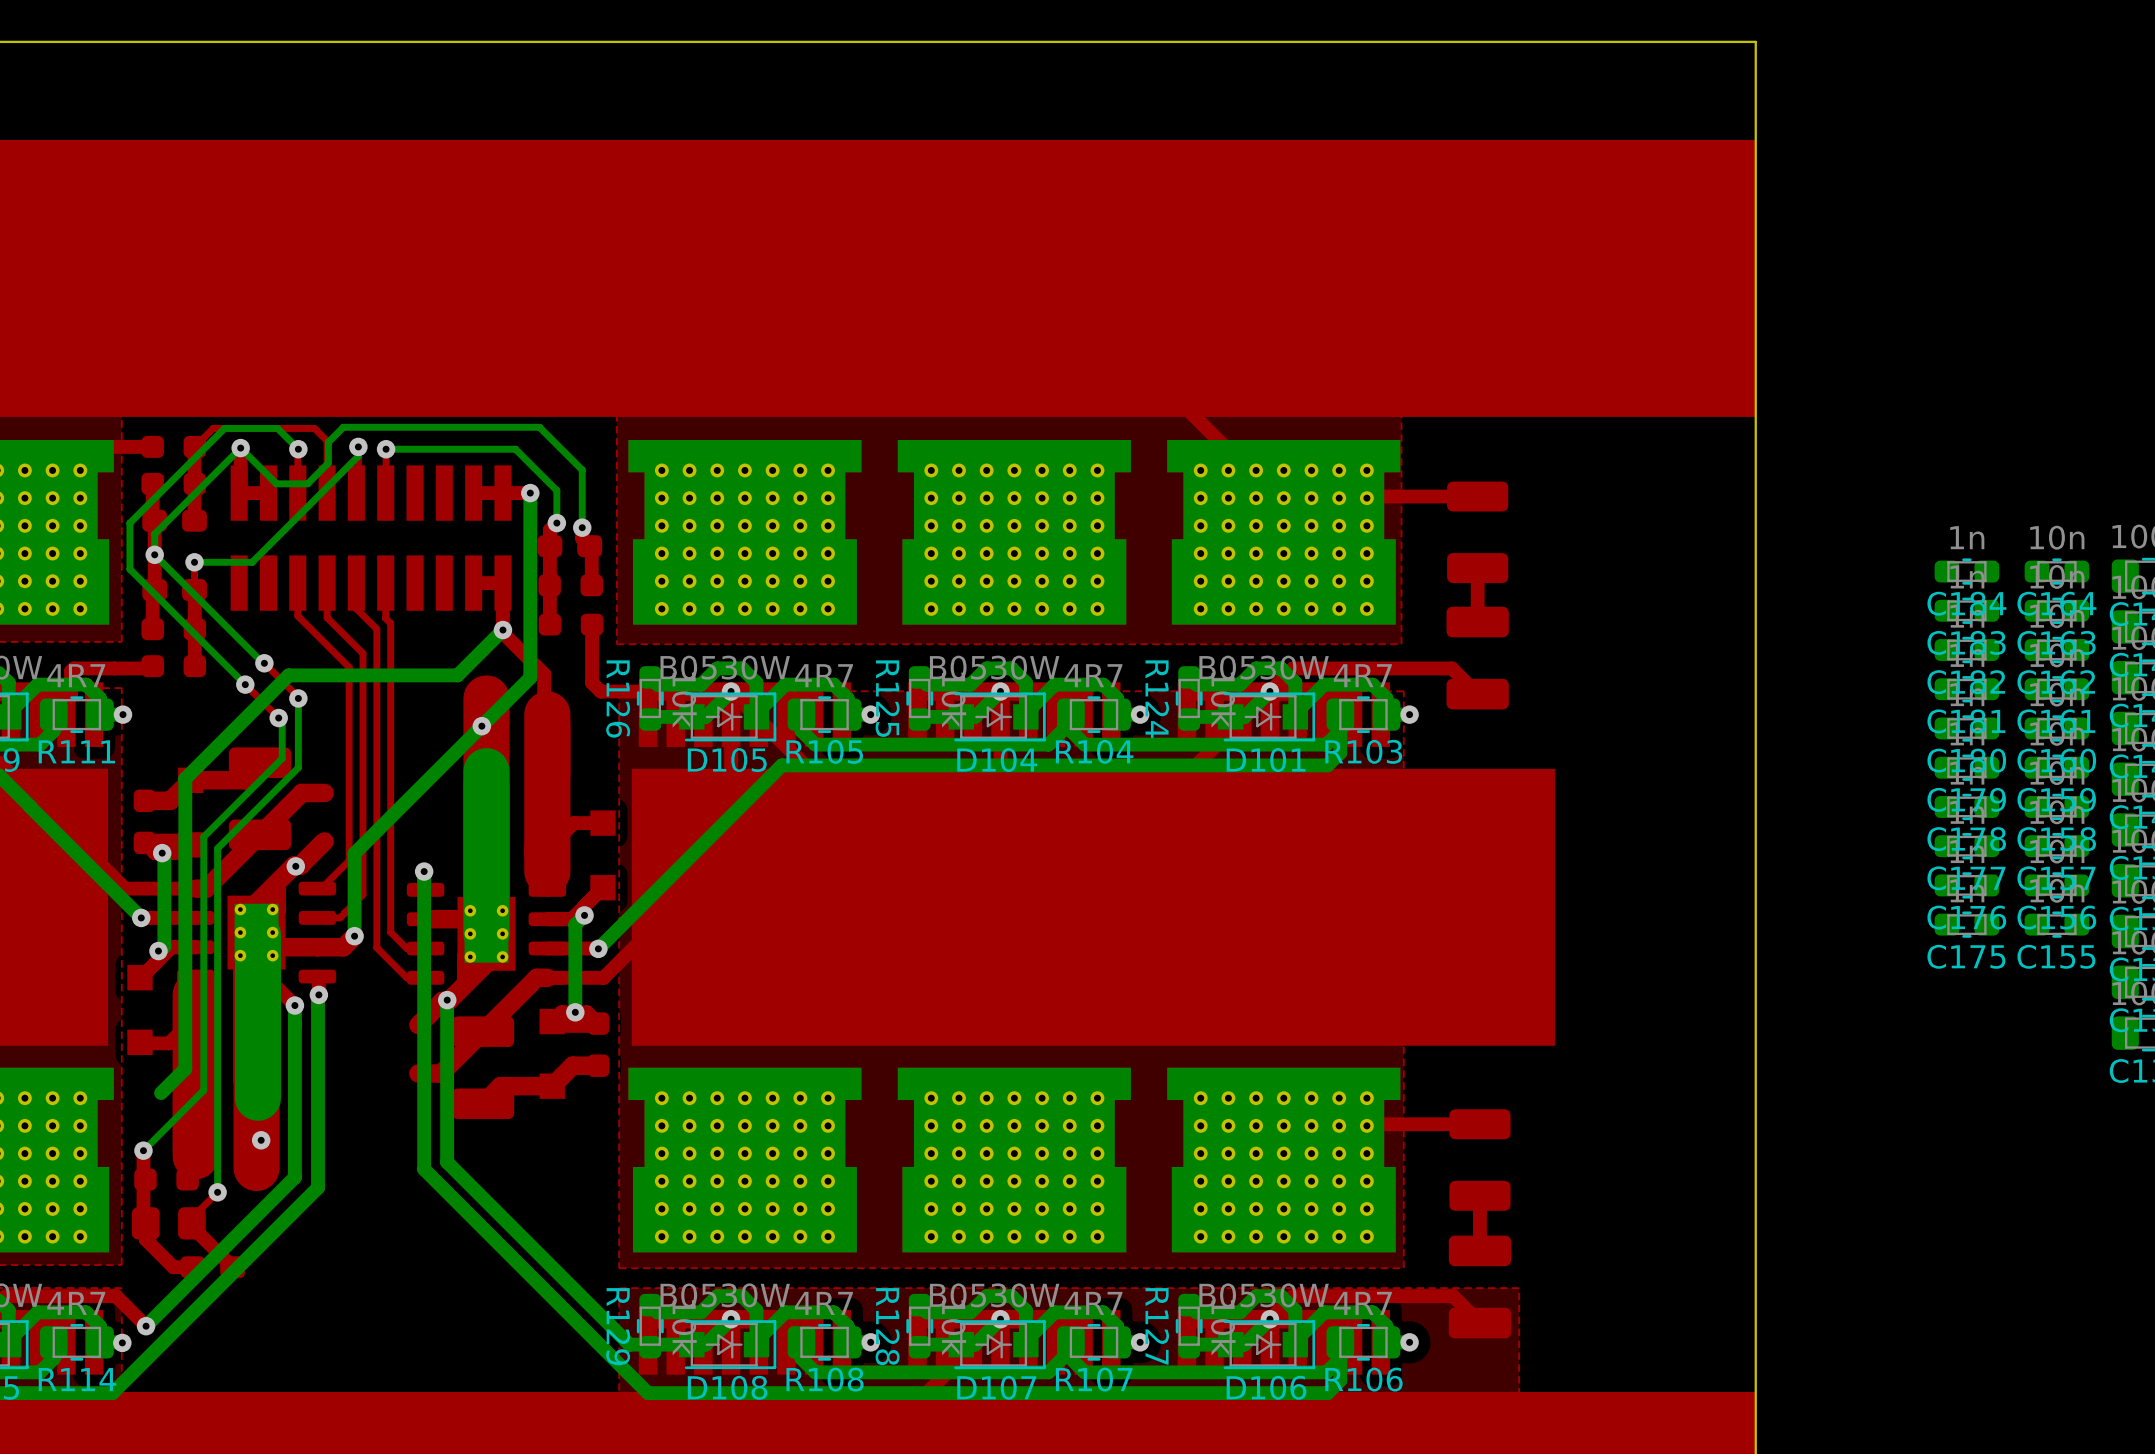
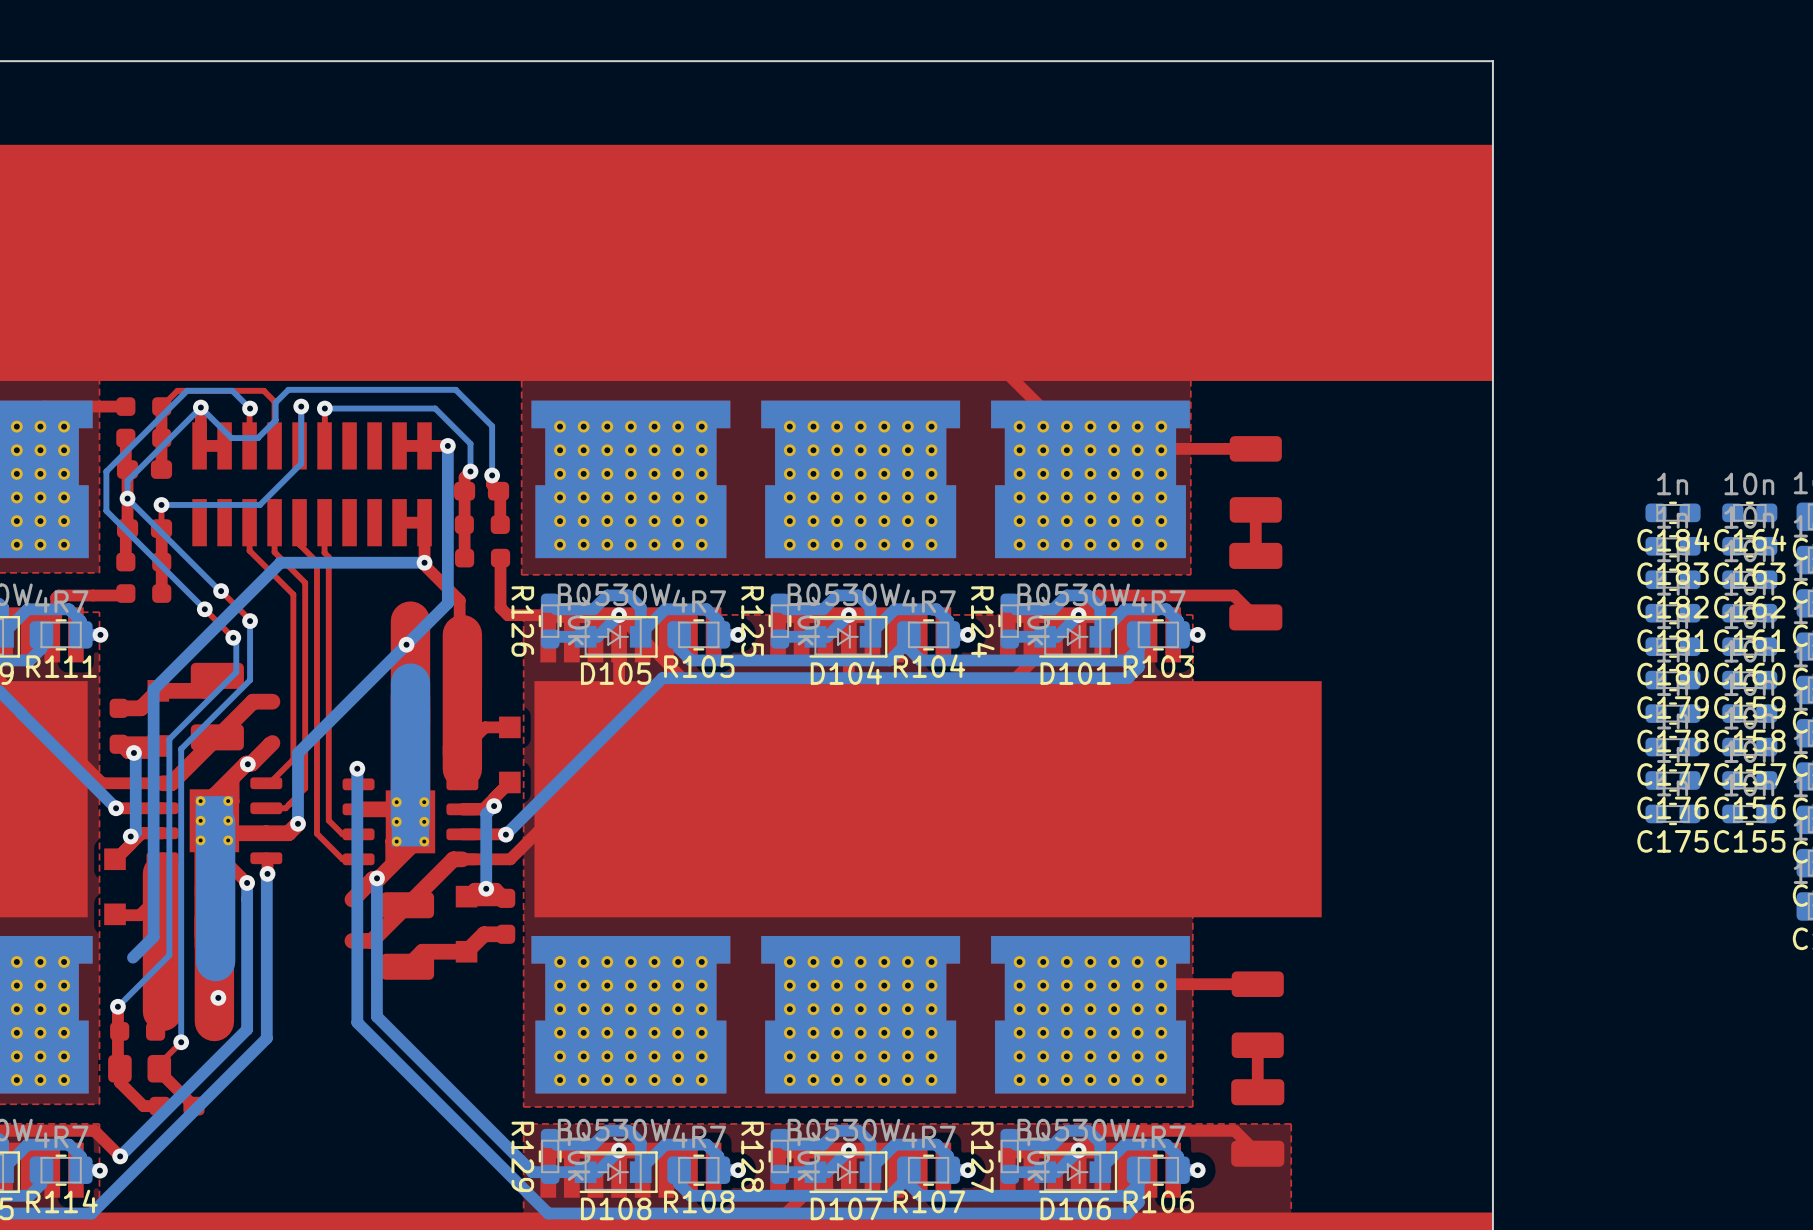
bottom track: (358, 456) (252, 562) -> (301, 414) (301, 463) (259, 504) (210, 504)
bottom track: (502, 630) (457, 675) (288, 675) -> (424, 562) (280, 562) (241, 601)

